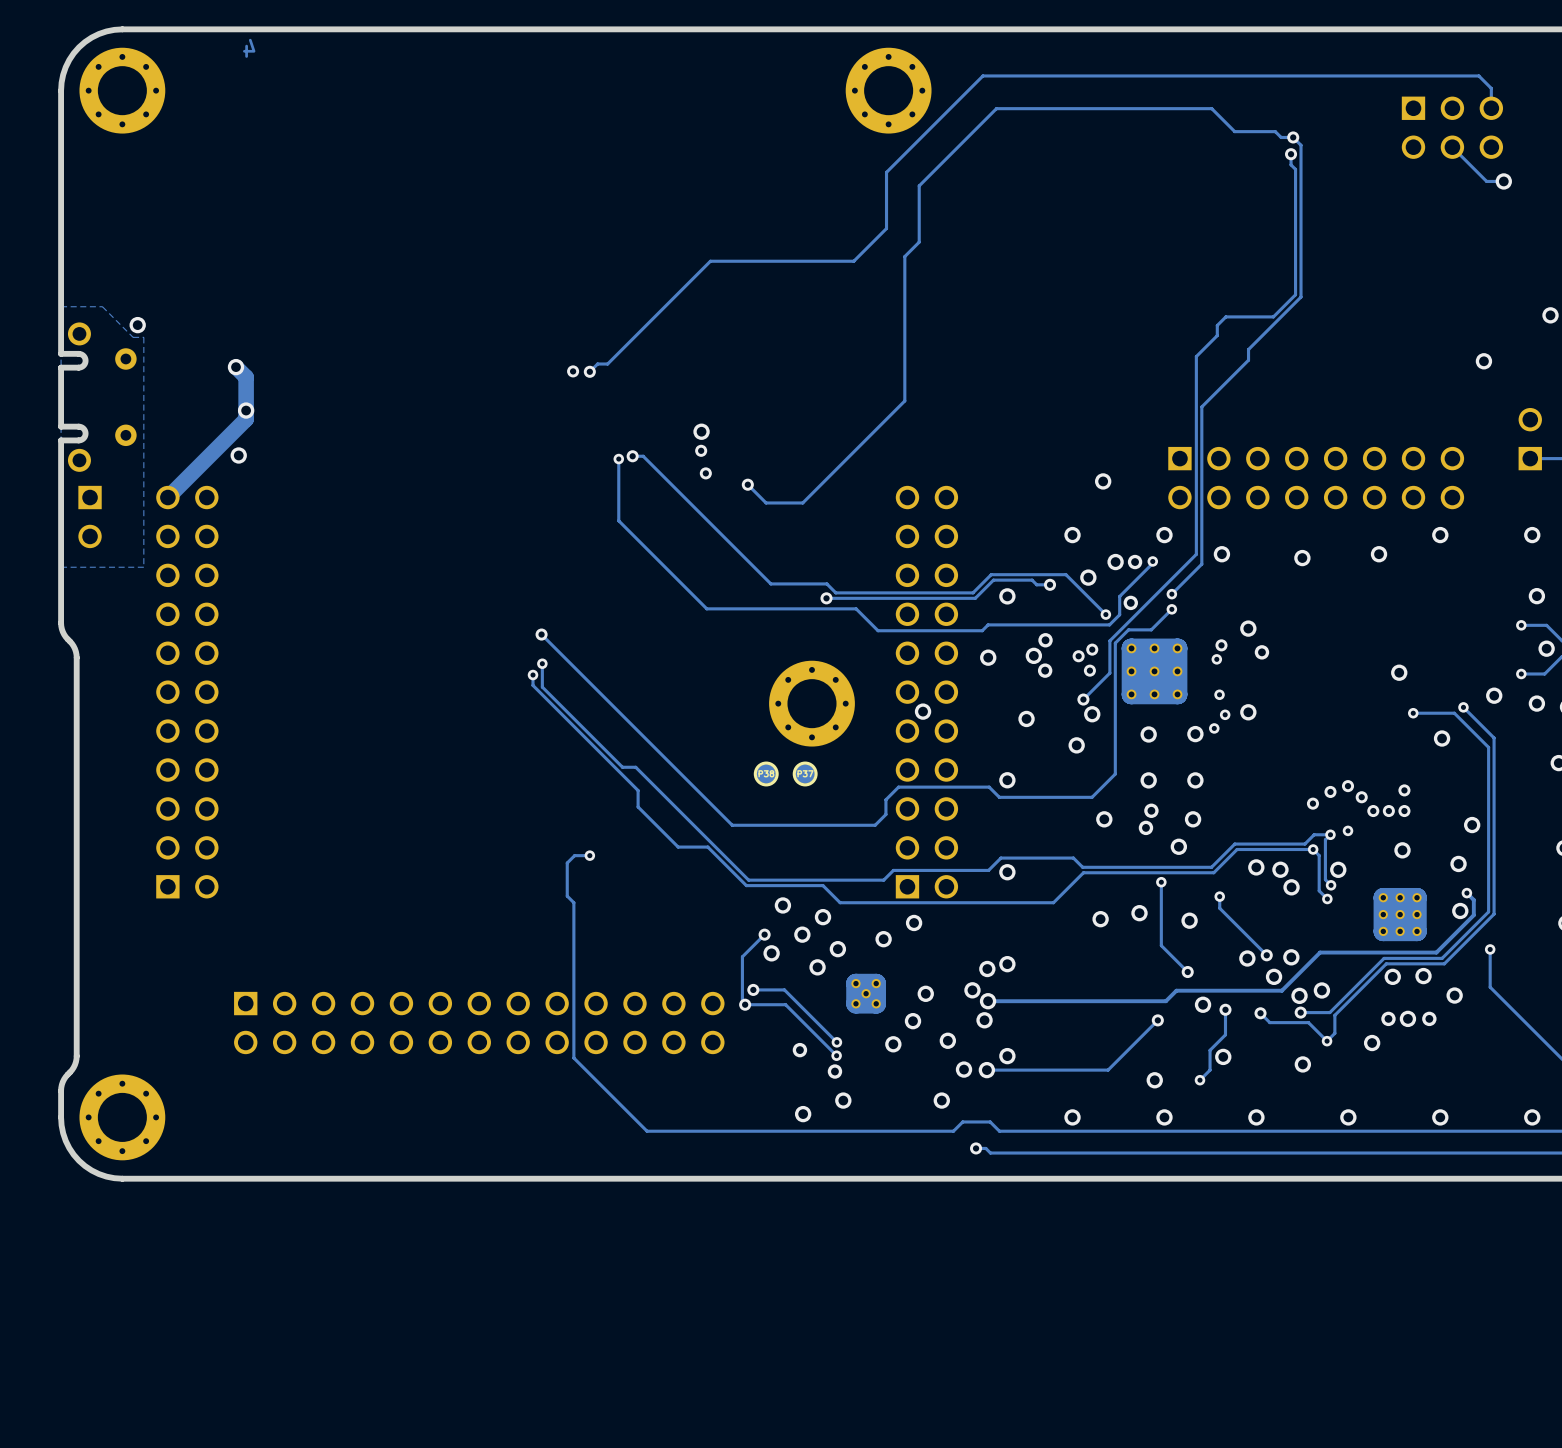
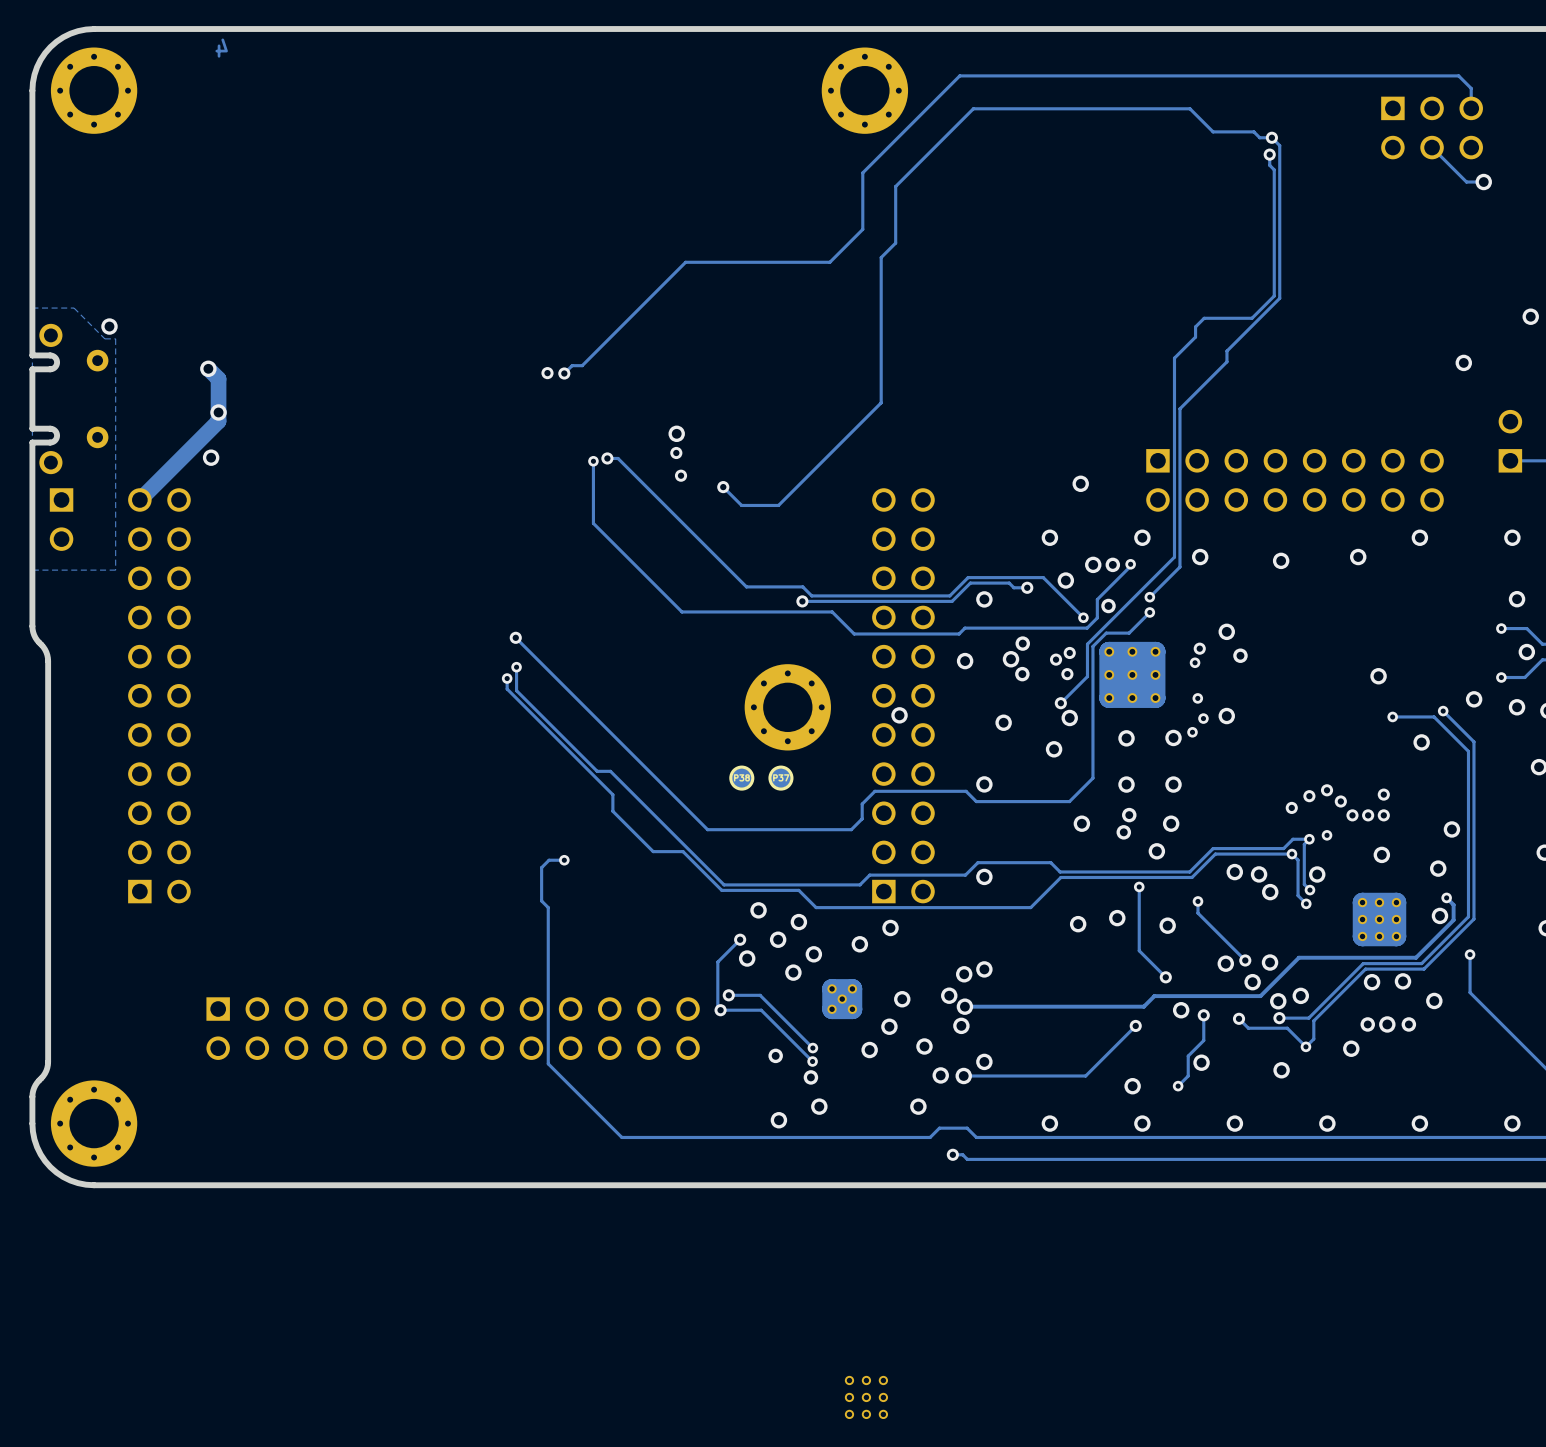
part: none -> (866, 1397)

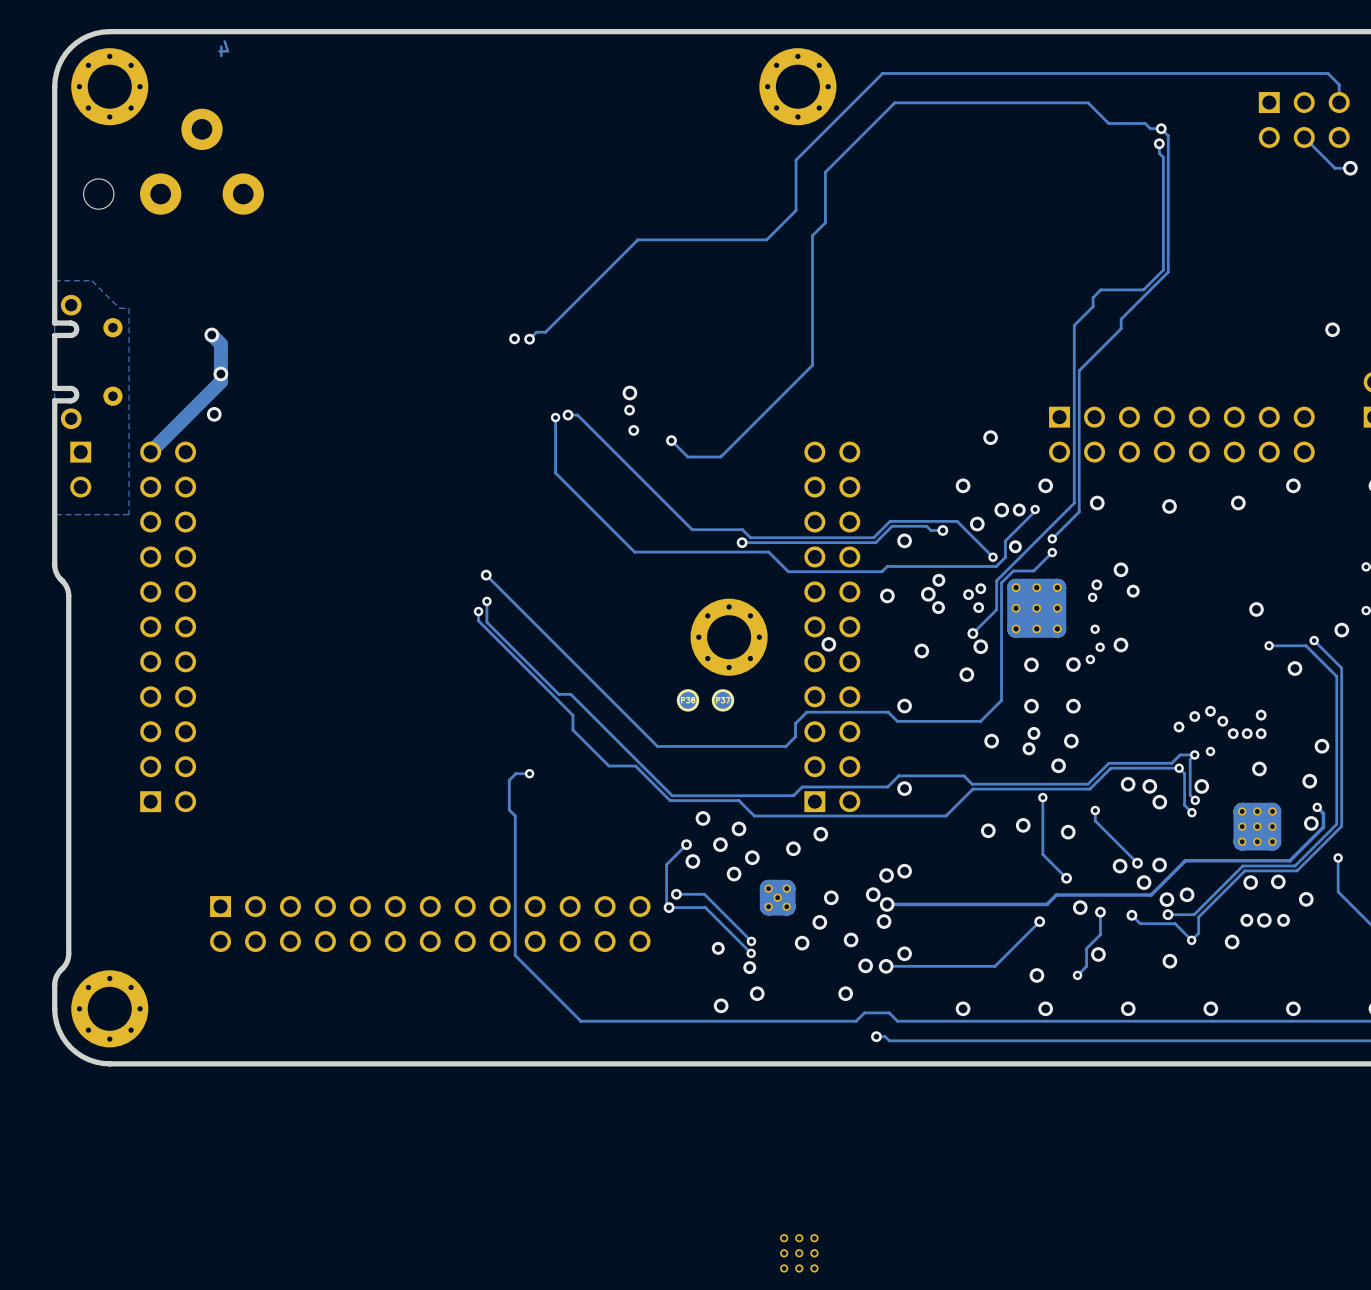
part: none -> (173, 161)
via: (109, 326) -> none

